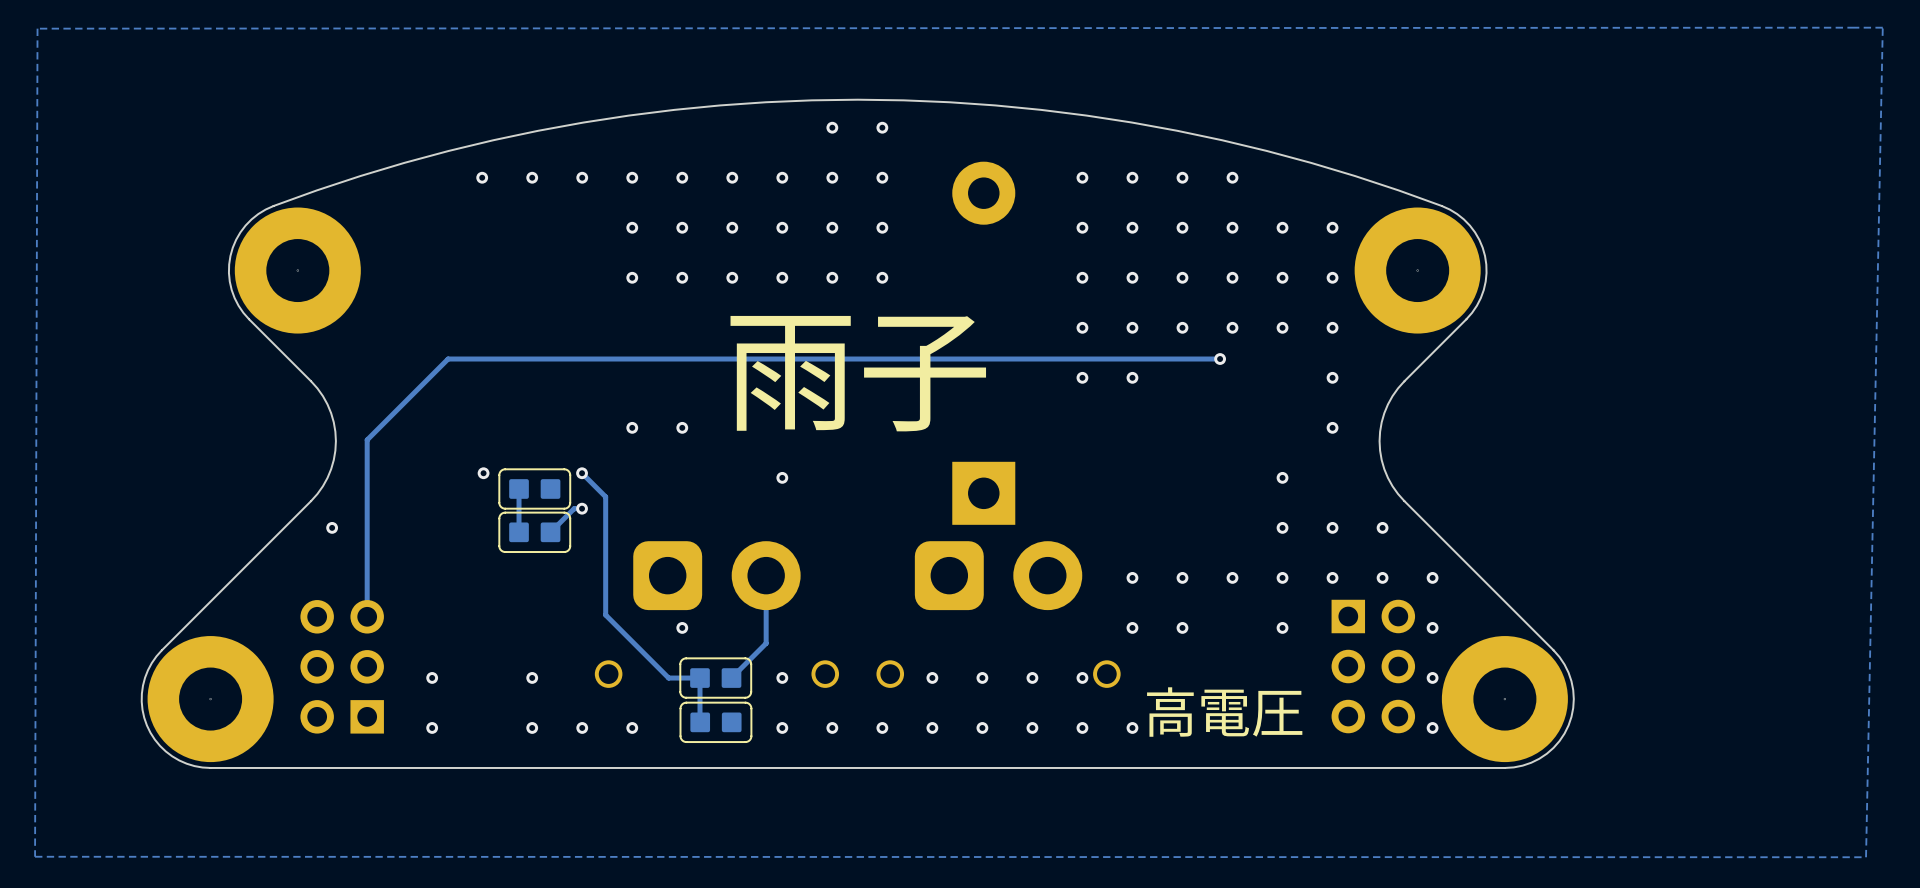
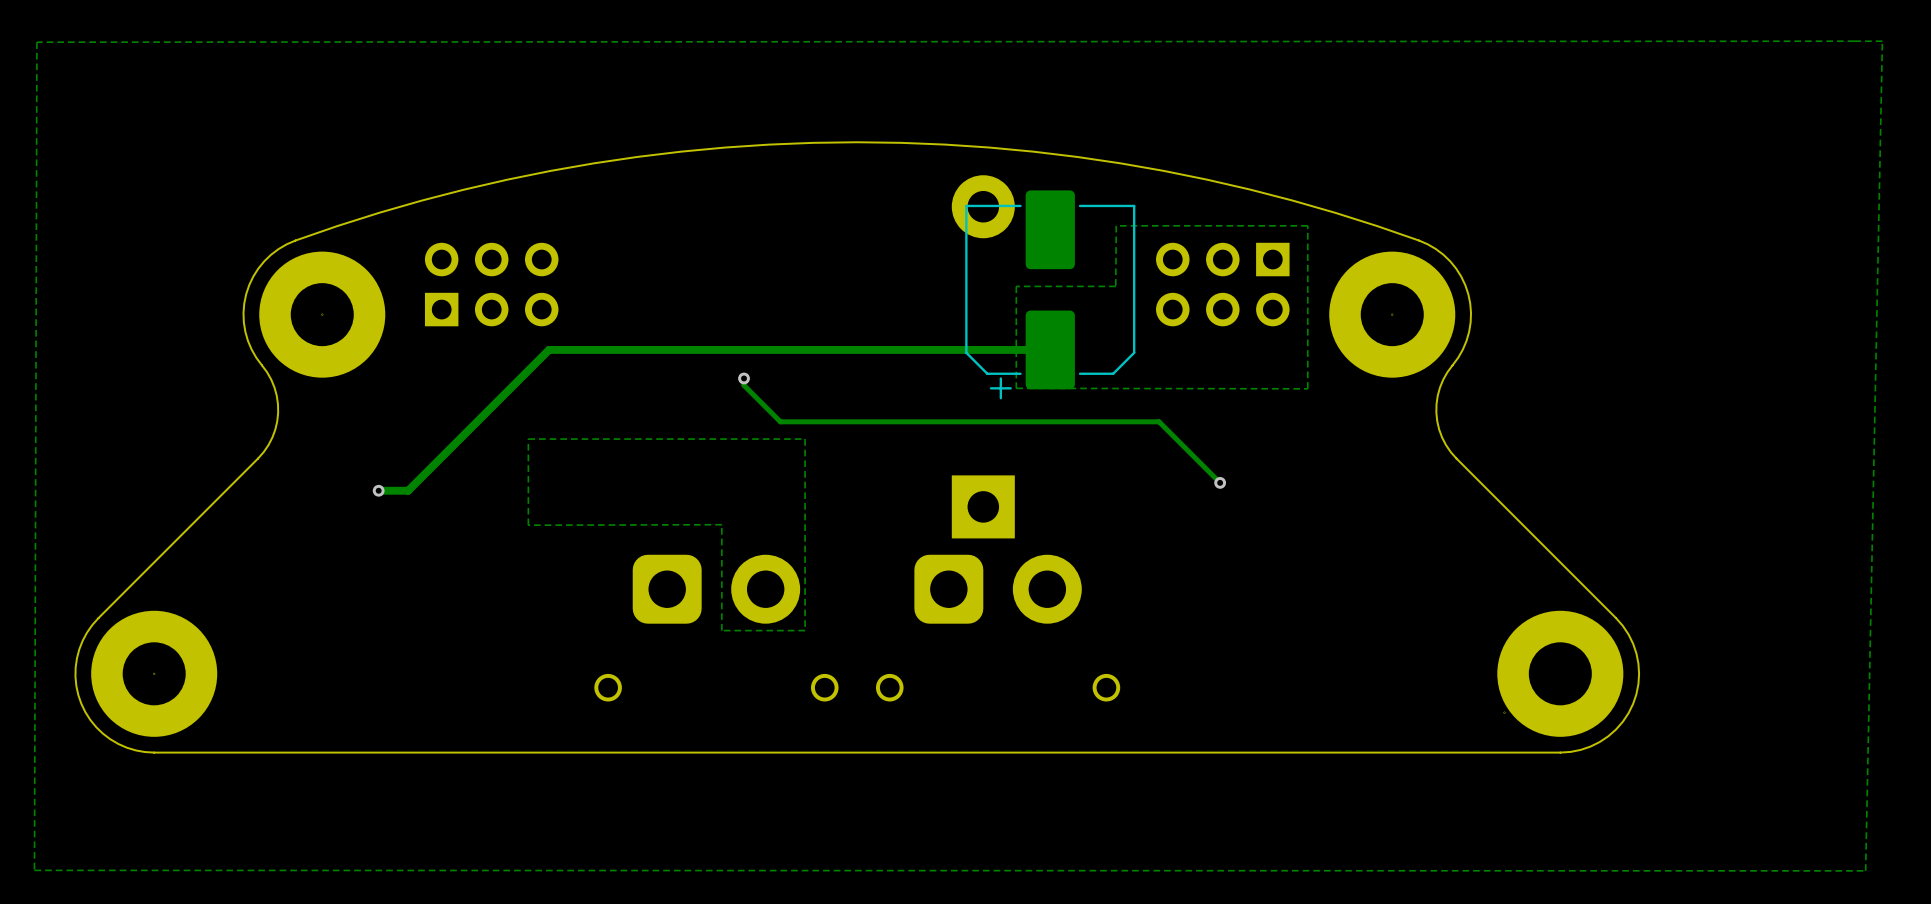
via: (832, 127) -> none
via: (882, 127) -> none
via: (482, 177) -> none
via: (532, 177) -> none
via: (582, 177) -> none
via: (632, 177) -> none
via: (682, 177) -> none
via: (732, 177) -> none
via: (782, 177) -> none
via: (832, 177) -> none
via: (882, 177) -> none
via: (1082, 177) -> none
via: (1132, 177) -> none
via: (1182, 177) -> none
via: (1232, 177) -> none
board edge: (1441, 206) (1463, 219) (1479, 239) (1486, 264) (1483, 290) (1472, 312) (1404, 381) (1392, 396) (1381, 422) (1380, 450) (1387, 477) (1398, 493) (1553, 650) (1568, 672) (1573, 699) (1568, 725) (1553, 747) (1531, 762) (1504, 767) (210, 767) (186, 763) (172, 756) (154, 739) (146, 725) (142, 709) (141, 693) (148, 670) (156, 656) (311, 501) (322, 486) (333, 460) (335, 431) (331, 413) (322, 396) (311, 381) (243, 312) (231, 290) (229, 264) (236, 239) (251, 219) (273, 206) (360, 176) (448, 150) (583, 122) (720, 105) (857, 99) (995, 105) (1086, 115) (1177, 130) (1311, 162) (1441, 206) -> (1419, 240) (1435, 249) (1450, 261) (1461, 276) (1470, 303) (1470, 322) (1466, 340) (1458, 357) (1443, 379) (1437, 395) (1437, 421) (1446, 445) (1456, 458) (1616, 618) (1628, 634) (1636, 653) (1638, 684) (1628, 713) (1608, 736) (1580, 749) (1560, 752) (154, 752) (135, 750) (110, 739) (90, 720) (78, 695) (75, 676) (76, 658) (82, 640) (92, 625) (258, 458) (272, 437) (277, 421) (276, 395) (271, 379) (251, 349) (243, 322) (246, 294) (253, 276) (264, 261) (278, 249) (295, 240) (337, 226) (464, 189) (593, 163) (725, 147) (857, 142) (989, 147) (1077, 156) (1164, 170) (1292, 200) (1419, 240)
zone outline: none -> (1307, 225) (1116, 225) (1115, 286) (1016, 286) (1016, 388) (1307, 388) (1307, 225)
via: (632, 227) -> none
via: (682, 227) -> none
via: (732, 227) -> none
via: (782, 227) -> none
via: (832, 227) -> none
via: (882, 227) -> none
via: (1082, 227) -> none
via: (1132, 227) -> none
via: (1182, 227) -> none
via: (1232, 227) -> none
via: (1282, 227) -> none
via: (1332, 227) -> none
part position: (297, 270) -> (322, 314)
part position: (1417, 270) -> (1392, 314)
via: (632, 277) -> none
via: (682, 277) -> none
via: (732, 277) -> none
via: (782, 277) -> none
via: (832, 277) -> none
via: (882, 277) -> none
via: (1082, 277) -> none
via: (1132, 277) -> none
via: (1182, 277) -> none
via: (1232, 277) -> none
via: (1282, 277) -> none
via: (1332, 277) -> none
part: none -> (1050, 294)
via: (1082, 327) -> none
via: (1132, 327) -> none
via: (1182, 327) -> none
via: (1232, 327) -> none
via: (1282, 327) -> none
via: (1332, 327) -> none
track: none -> (1050, 349) (549, 349) (408, 490) (378, 490)
track: (1220, 359) (448, 359) (367, 439) (367, 616) -> none
via: (1220, 359) -> none
track: none -> (744, 378) (744, 385) (780, 421) (1159, 421) (1220, 482)
via: none -> (744, 378)
text: 雨子 (858, 373) -> none
via: (1082, 377) -> none
via: (1132, 377) -> none
via: (1332, 377) -> none
zone outline: none -> (805, 439) (528, 439) (528, 525) (721, 524) (721, 630) (805, 630) (805, 439)
via: (632, 427) -> none
via: (682, 427) -> none
via: (1332, 427) -> none
via: none -> (1220, 482)
via: (483, 473) -> none
track: (582, 473) (605, 496) (605, 615) (668, 678) (700, 678) (700, 722) -> none
via: (582, 473) -> none
via: none -> (378, 490)
via: (782, 477) -> none
via: (1282, 477) -> none
track: (519, 488) (519, 532) -> none
part: (534, 488) -> none
track: (582, 508) (574, 508) (550, 532) -> none
via: (582, 508) -> none
via: (332, 527) -> none
via: (1282, 527) -> none
via: (1332, 527) -> none
via: (1382, 527) -> none
part: (534, 532) -> none
track: (766, 575) (766, 643) (731, 678) -> none
via: (1132, 577) -> none
via: (1182, 577) -> none
via: (1232, 577) -> none
via: (1282, 577) -> none
via: (1332, 577) -> none
via: (1382, 577) -> none
via: (1432, 577) -> none
via: (682, 627) -> none
via: (1132, 627) -> none
via: (1182, 627) -> none
via: (1282, 627) -> none
via: (1432, 627) -> none
part rotation: 0° (342, 666) -> 90° clockwise (491, 284)
part position: (342, 666) -> (491, 284)
part rotation: 0° (1373, 666) -> 90° clockwise (1222, 284)
part position: (1373, 666) -> (1222, 284)
via: (432, 677) -> none
via: (532, 677) -> none
via: (782, 677) -> none
via: (932, 677) -> none
via: (982, 677) -> none
via: (1032, 677) -> none
via: (1082, 677) -> none
via: (1432, 677) -> none
part: (715, 678) -> none
part position: (210, 699) -> (154, 673)
part position: (1504, 699) -> (1560, 673)
text: 高電圧 (1224, 712) -> none
part: (715, 722) -> none
via: (432, 727) -> none
via: (532, 727) -> none
via: (582, 727) -> none
via: (632, 727) -> none
via: (782, 727) -> none
via: (832, 727) -> none
via: (882, 727) -> none
via: (932, 727) -> none
via: (982, 727) -> none
via: (1032, 727) -> none
via: (1082, 727) -> none
via: (1132, 727) -> none
via: (1432, 727) -> none

